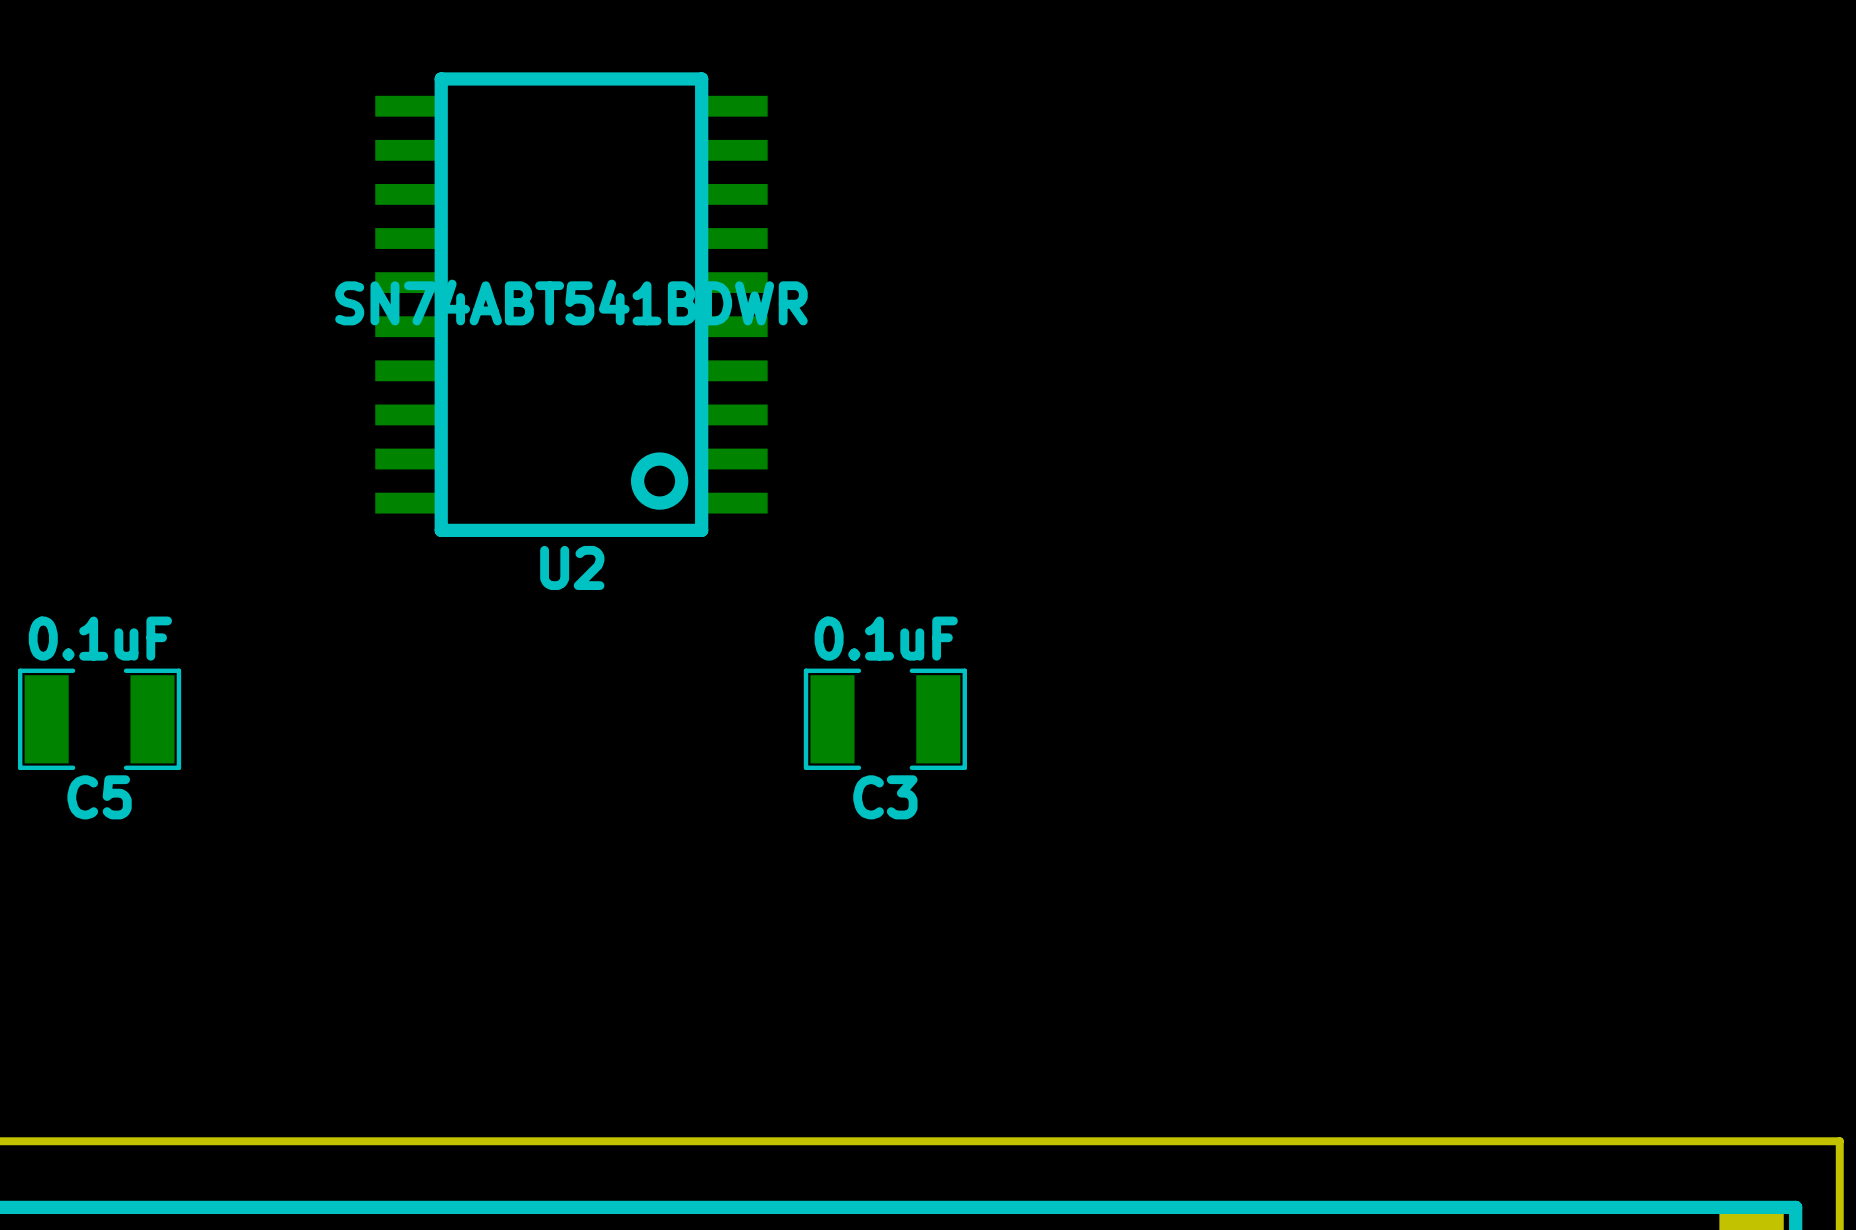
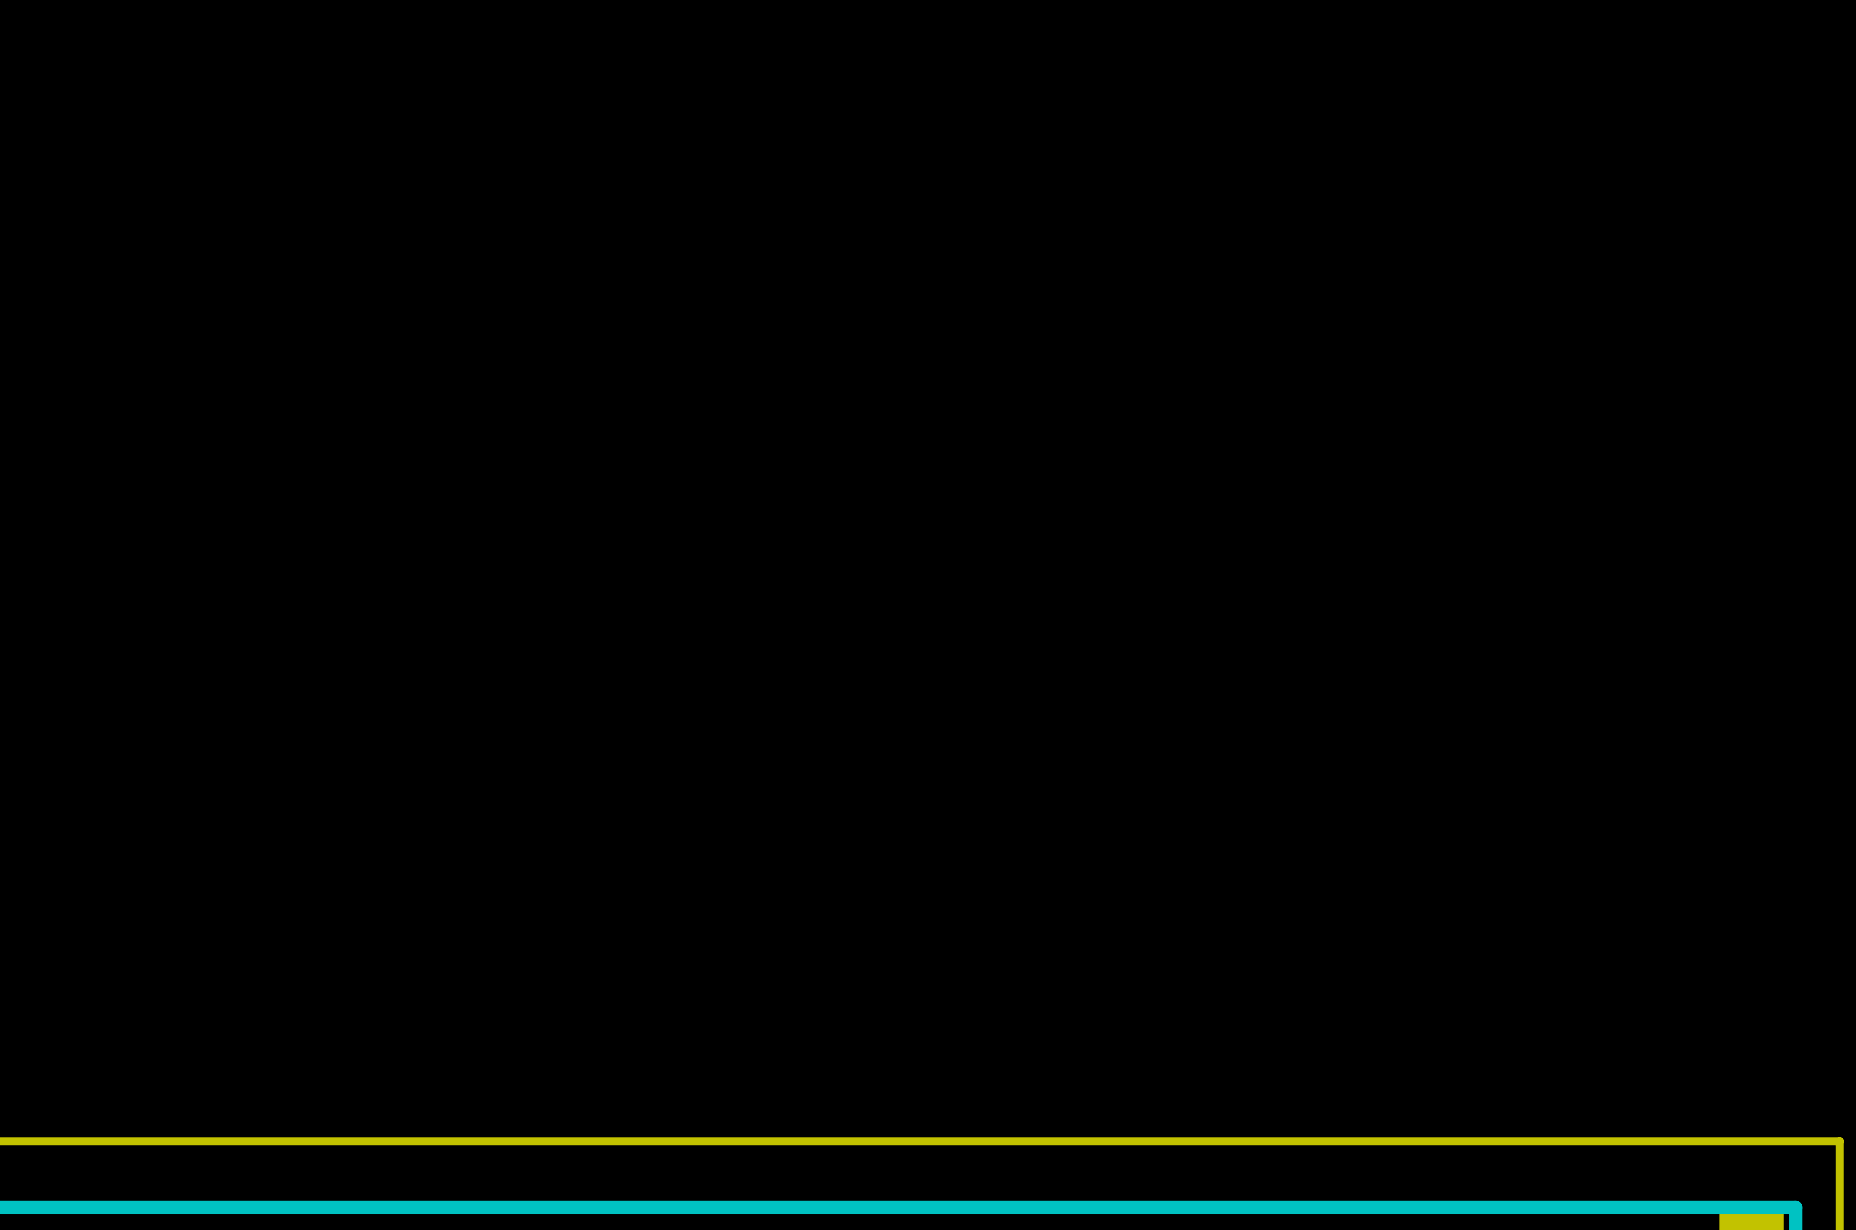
U2: SN74ABT541BDWR (571, 304) -> none
C5: 0.1uF (99, 719) -> none
C3: 0.1uF (885, 719) -> none

